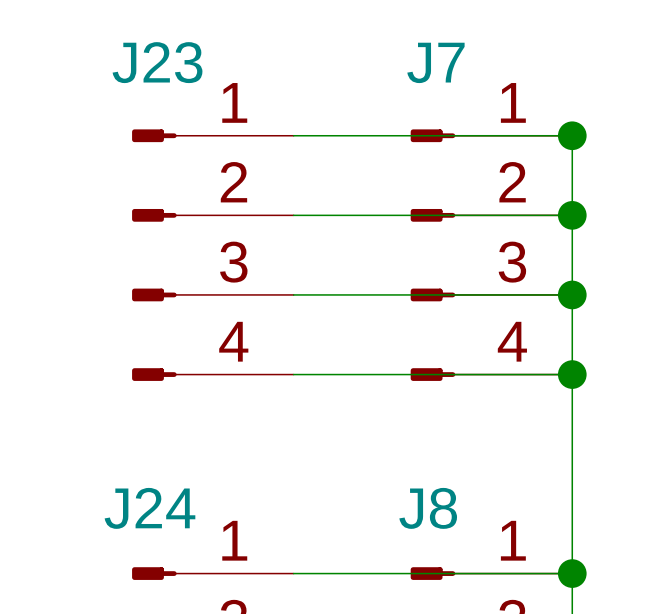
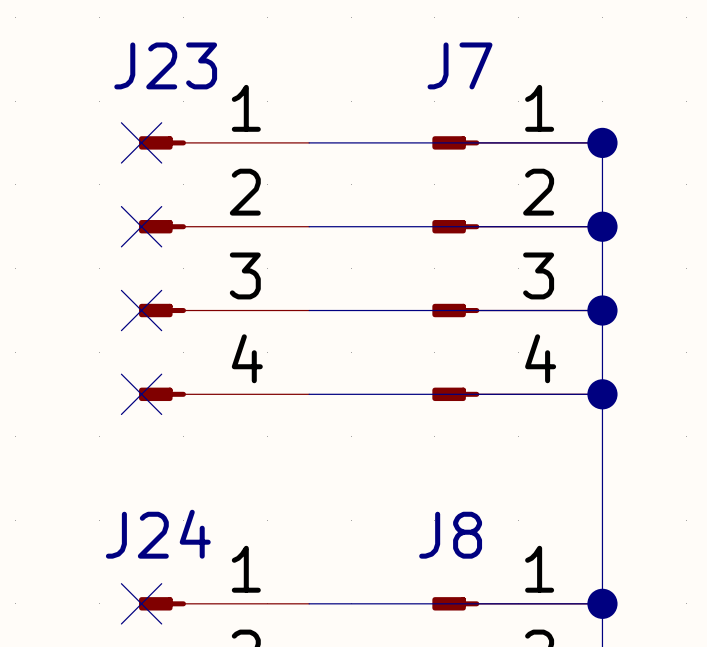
no-connect mark: none -> (141, 142)
no-connect mark: none -> (141, 226)
no-connect mark: none -> (141, 310)
no-connect mark: none -> (141, 394)
no-connect mark: none -> (141, 603)

